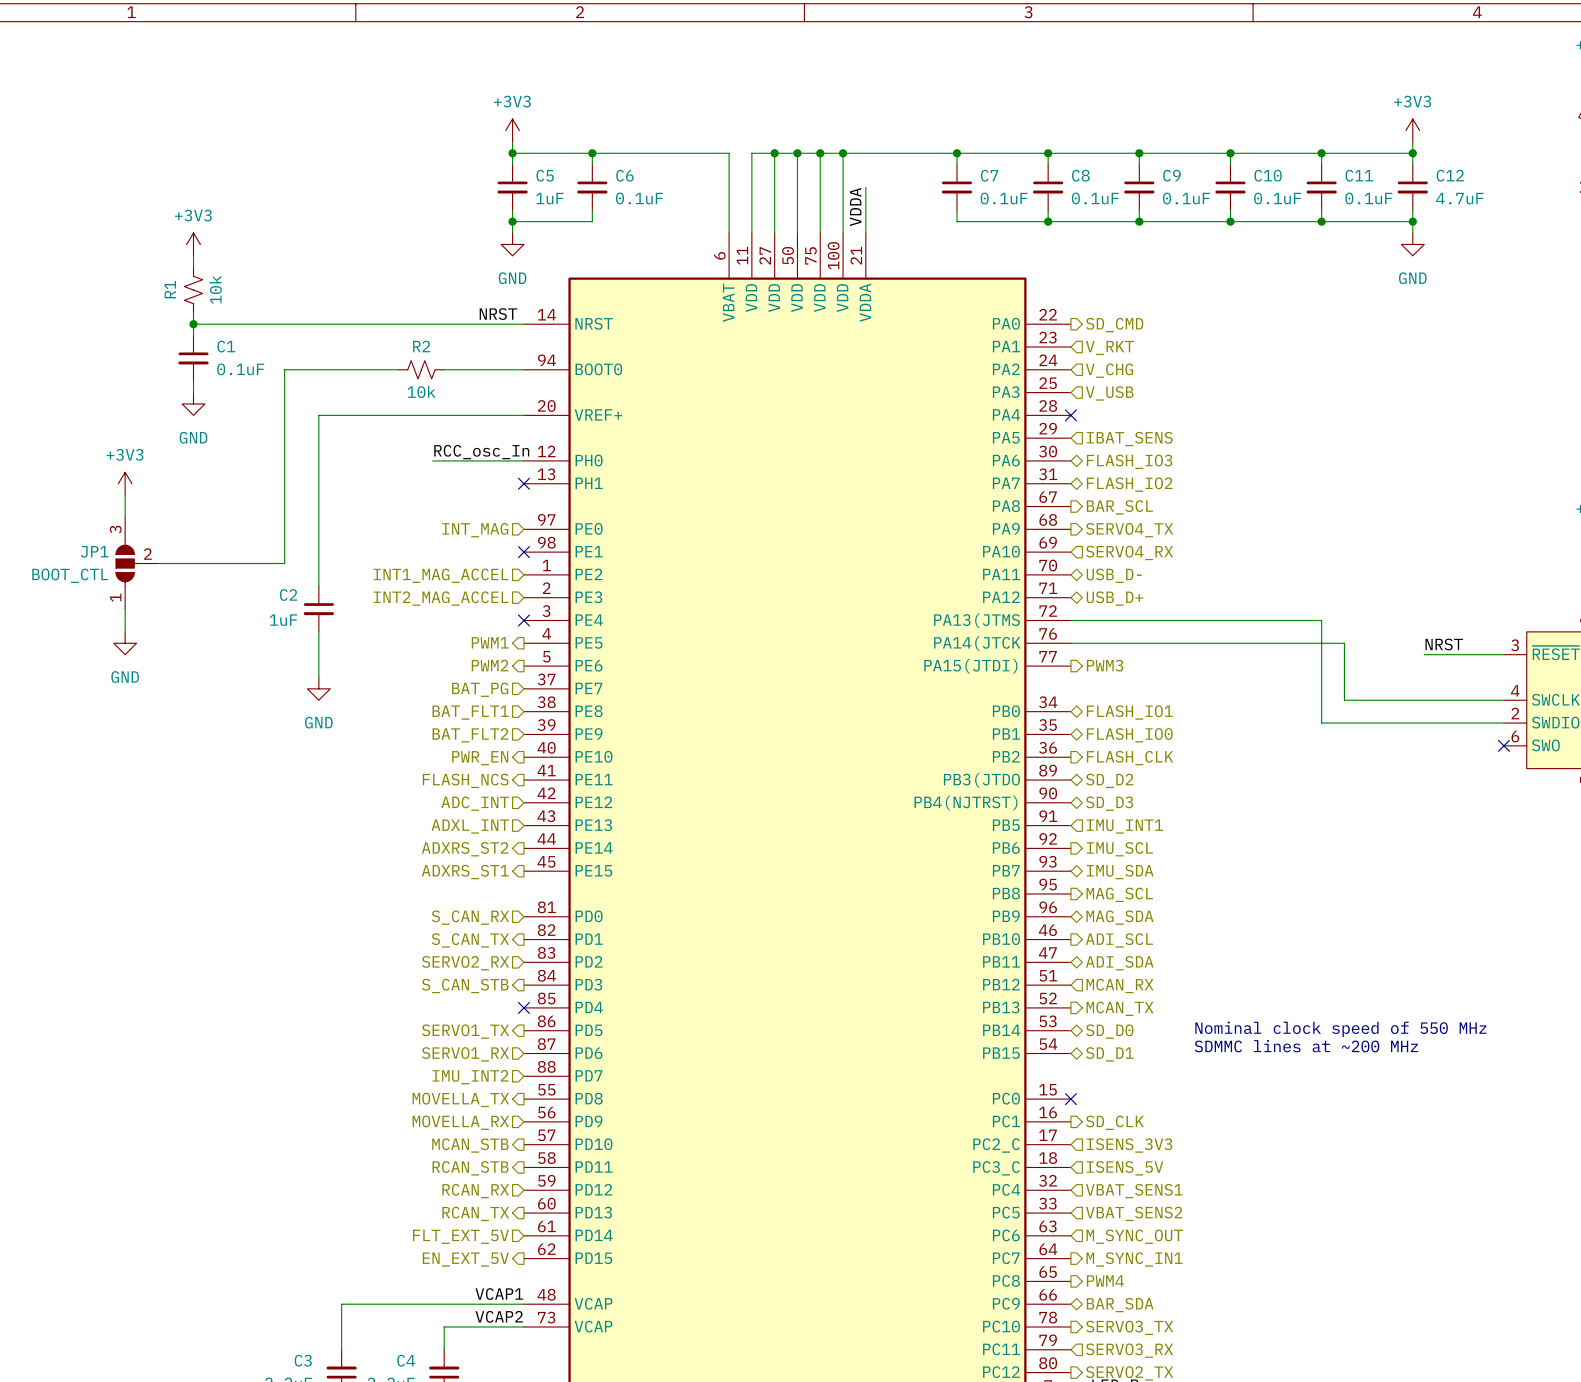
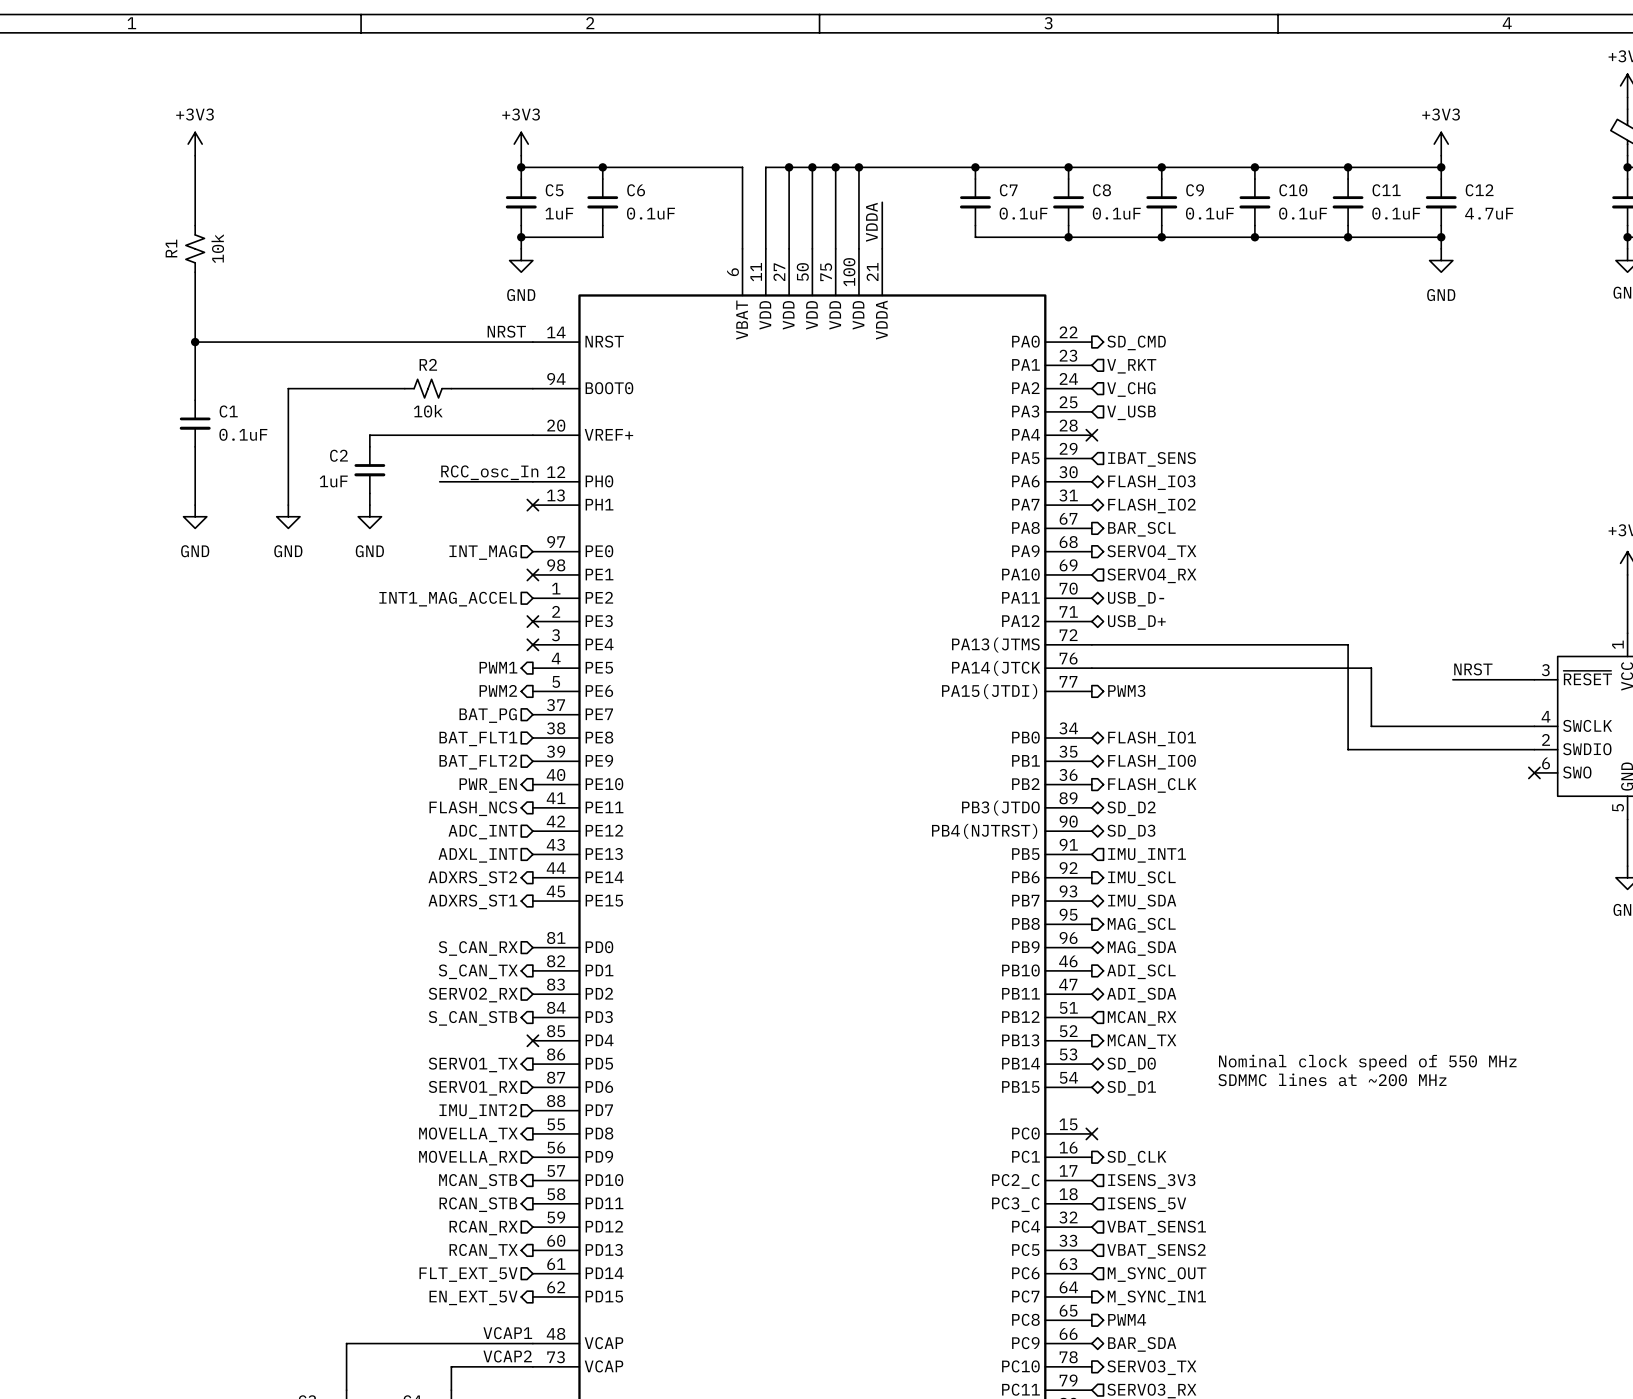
wire: none -> (195, 155) (195, 225)
power symbol position: +3V3 (193, 244) -> +3V3 (195, 144)
R1 position: (193, 290) -> (195, 248)
C1 position: (193, 358) -> (195, 423)
power symbol: GND (193, 403) -> none
wire: (364, 415) (318, 415) (318, 586) -> (369, 435) (369, 446)
wire: none -> (195, 446) (195, 505)
wire: none -> (369, 493) (369, 505)
power symbol: +3V3 (125, 483) -> none
wire: (284, 483) (284, 563) (159, 563) -> none
wire: (125, 495) (125, 517) -> none
power symbol: none -> GND (195, 516)
power symbol: none -> GND (288, 516)
power symbol: none -> GND (369, 516)
JP1: BOOT_CTL (137, 563) -> none
no-connect mark: none -> (532, 621)
hierarchical label: INT2_MAG_ACCEL (441, 598) -> none
wire: (125, 609) (125, 631) -> none
C2 position: (318, 609) -> (369, 470)
wire: (318, 631) (318, 677) -> none
power symbol: GND (125, 643) -> none
power symbol: GND (318, 688) -> none

